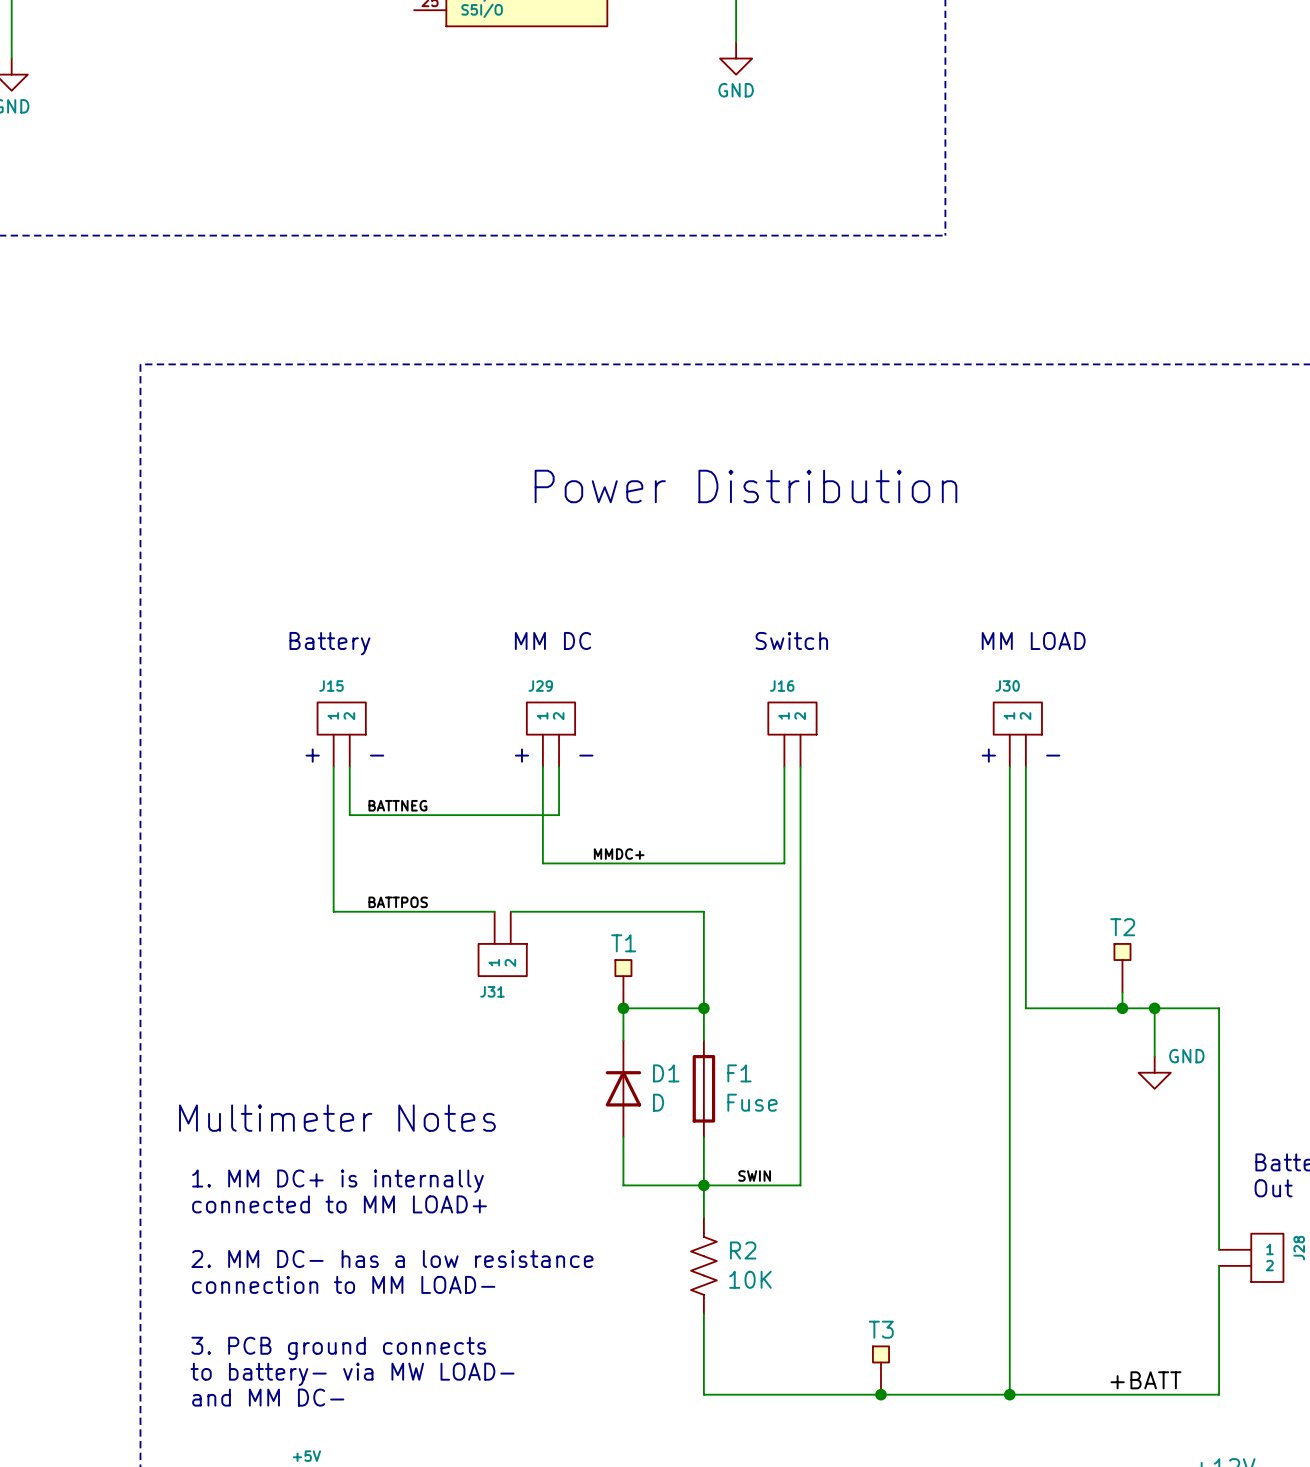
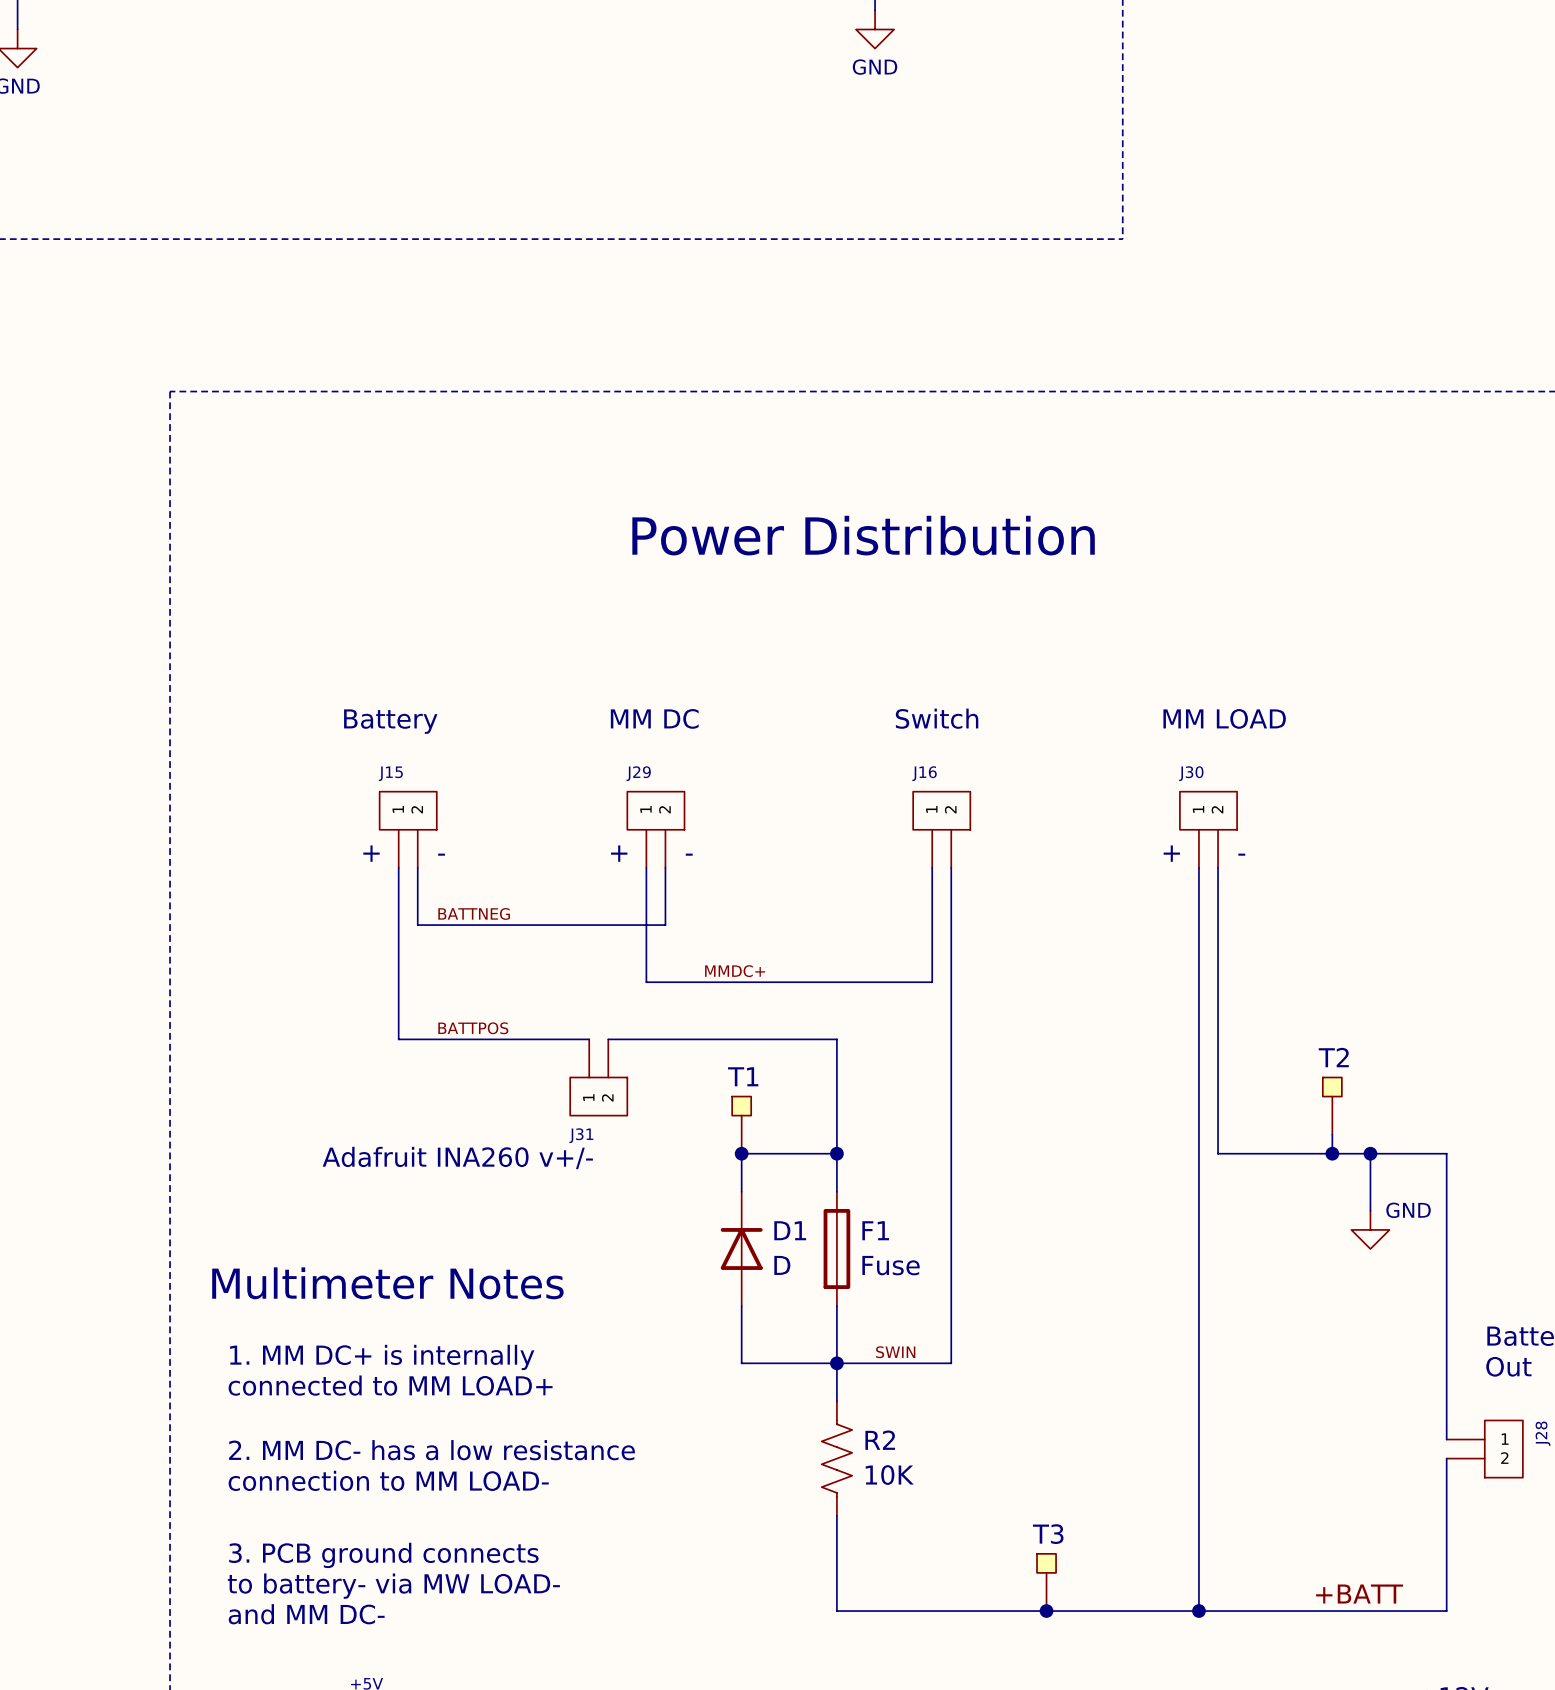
text: none -> Adafruit INA260 v+/- (457, 1157)

